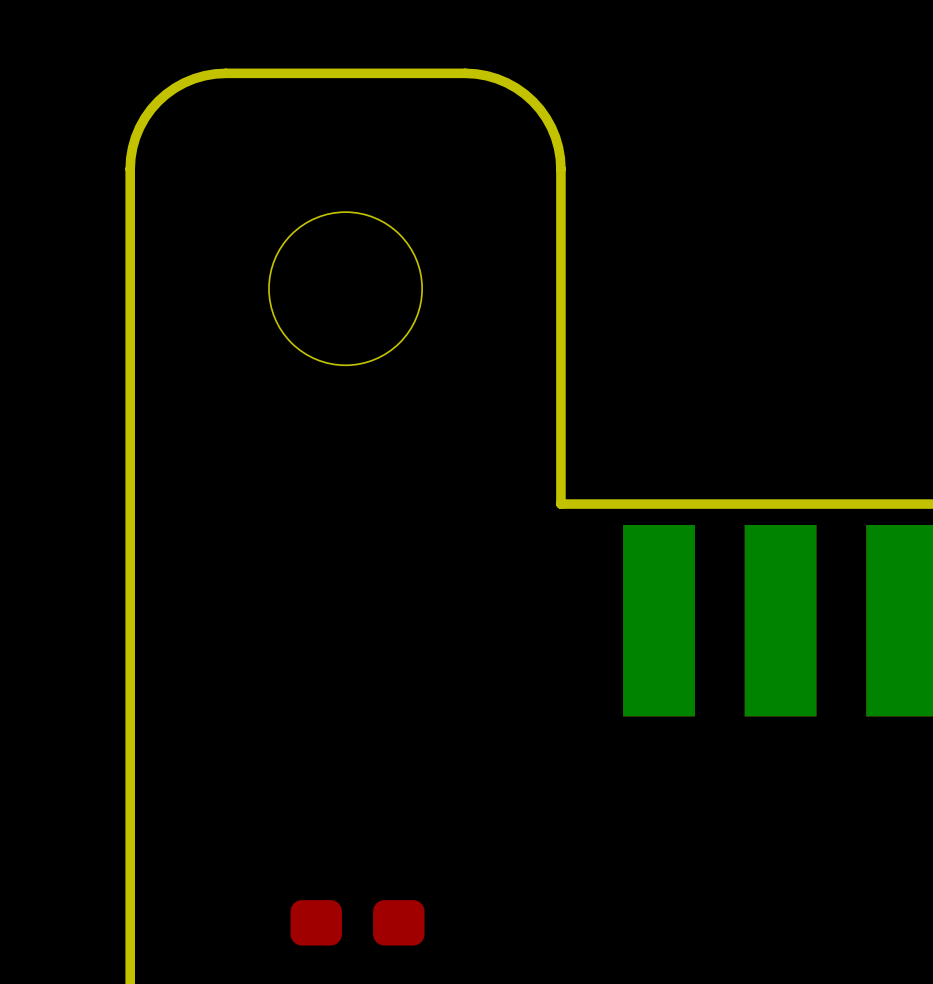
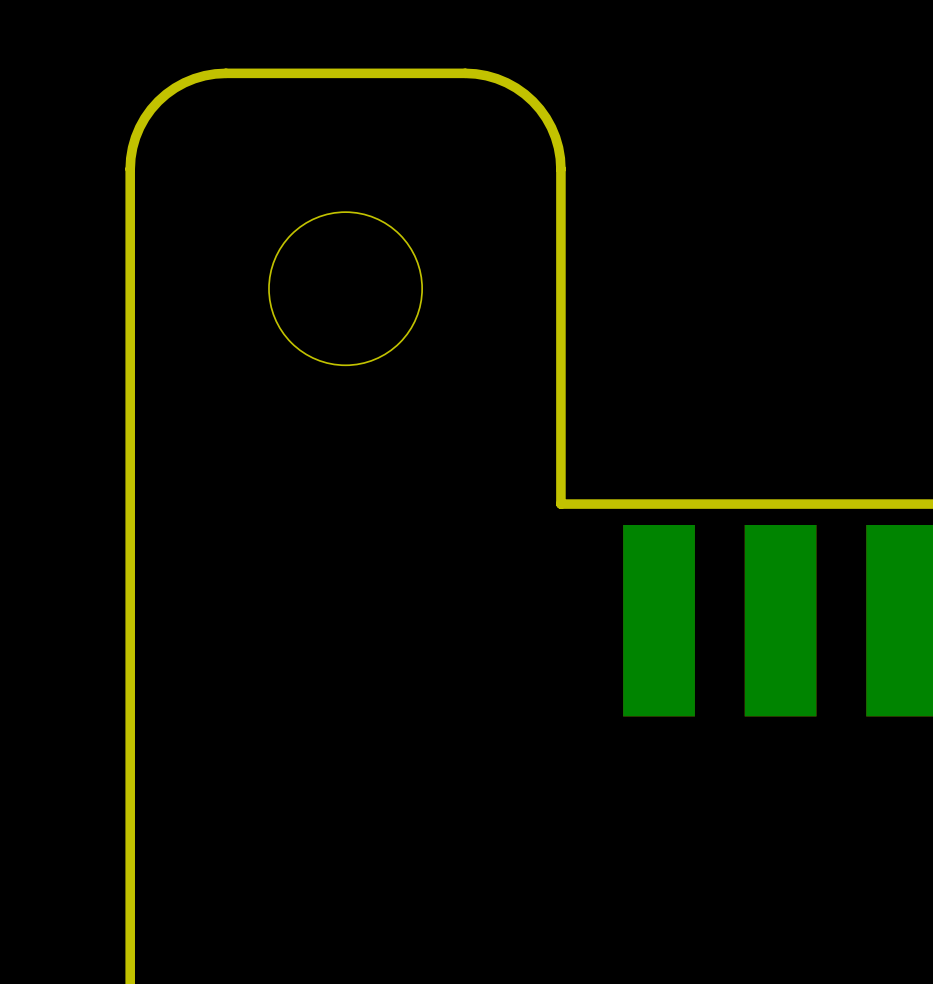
part: (357, 922) -> none

